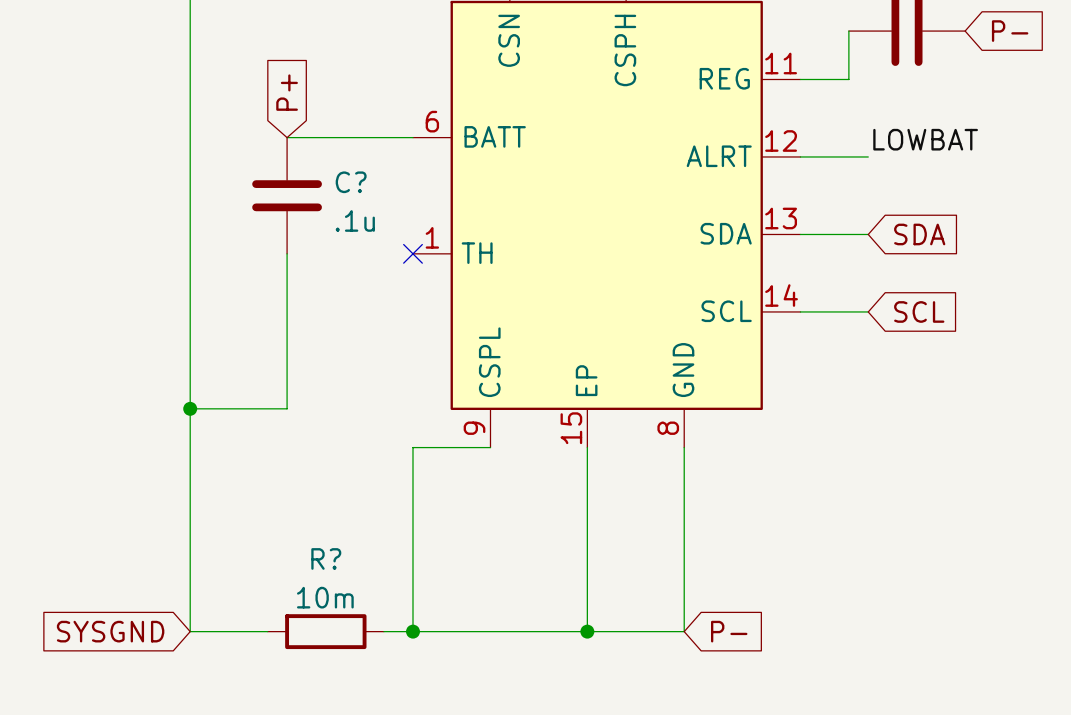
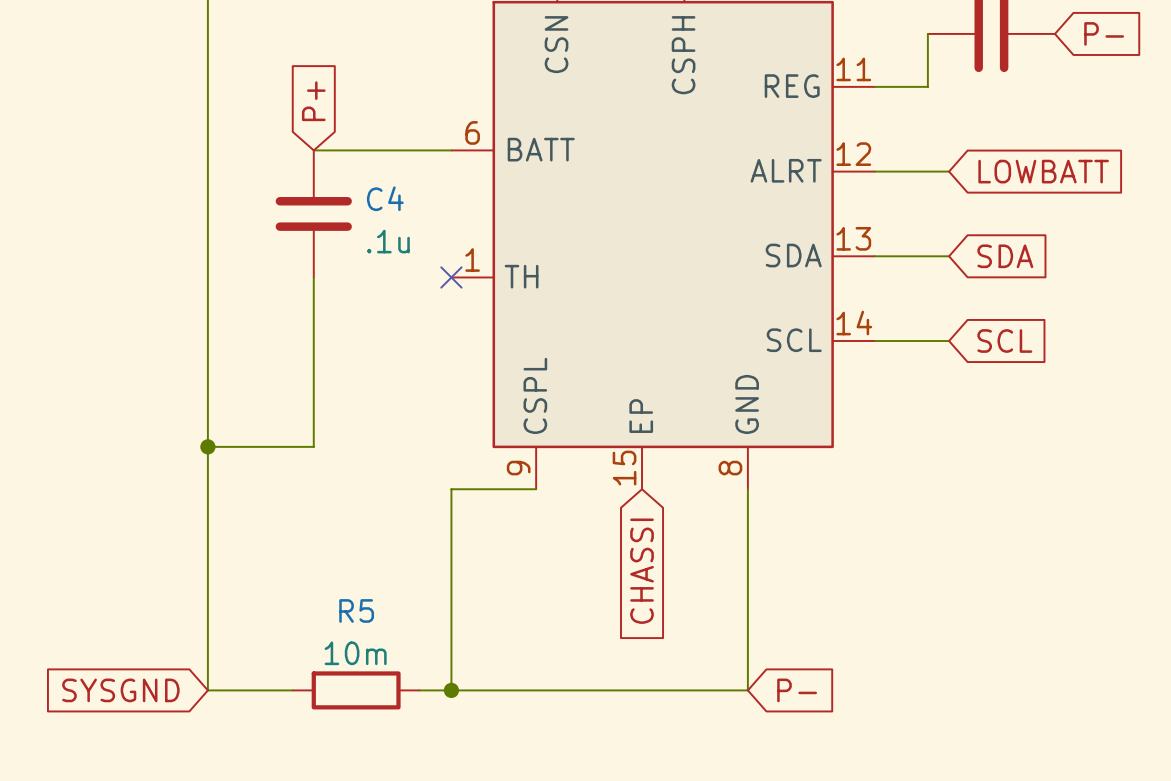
label: LOWBAT (925, 139) -> none
global label: none -> LOWBATT (1043, 171)
C? name: C? (351, 182) -> C4 (385, 198)
wire: (587, 447) (587, 631) -> none
global label: none -> CHASSI (642, 571)
R? name: R? (326, 558) -> R5 (356, 610)
junction: (587, 631) -> none

